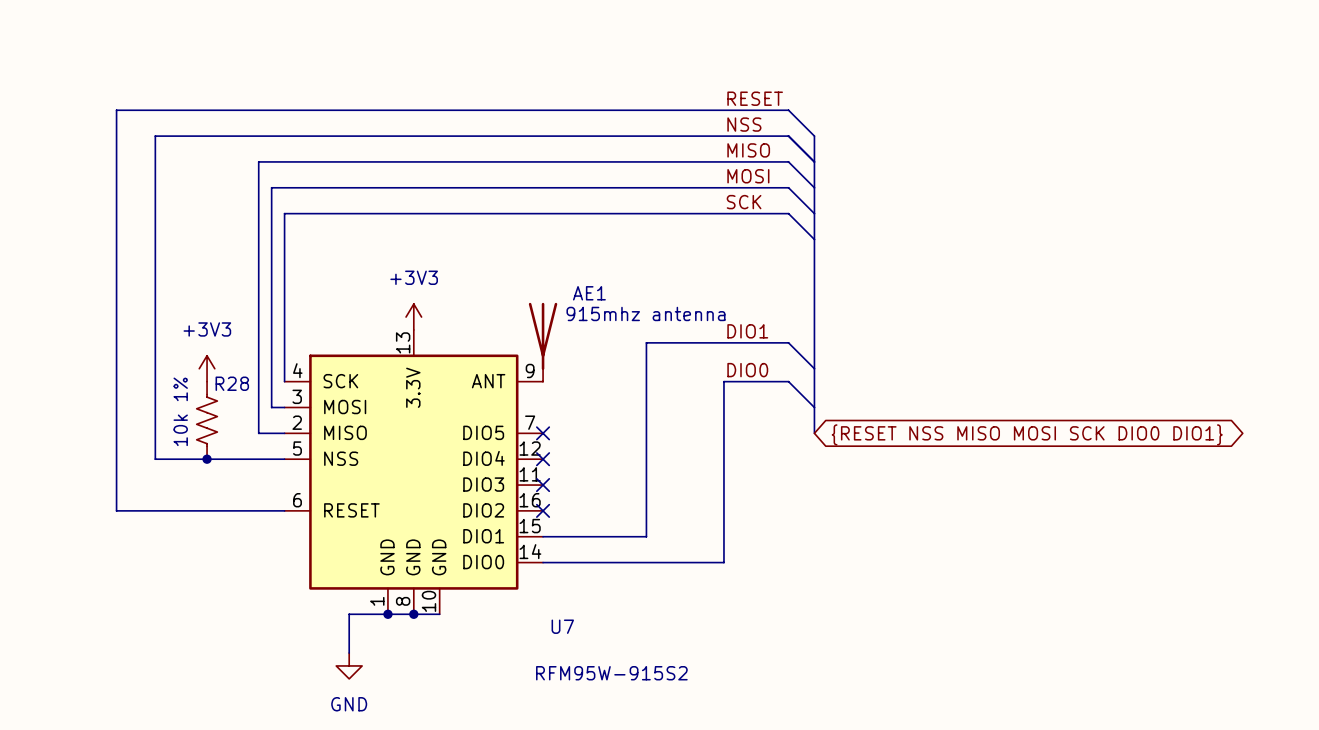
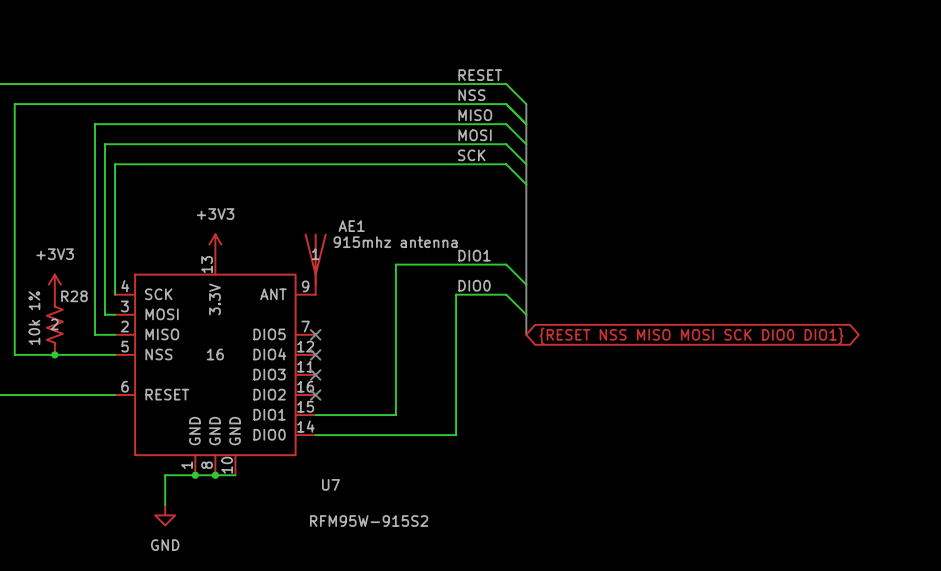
AE1 text: none -> 1 (315, 254)
R28 text: none -> 2 (54, 324)
U7 text: none -> 16 (215, 354)

